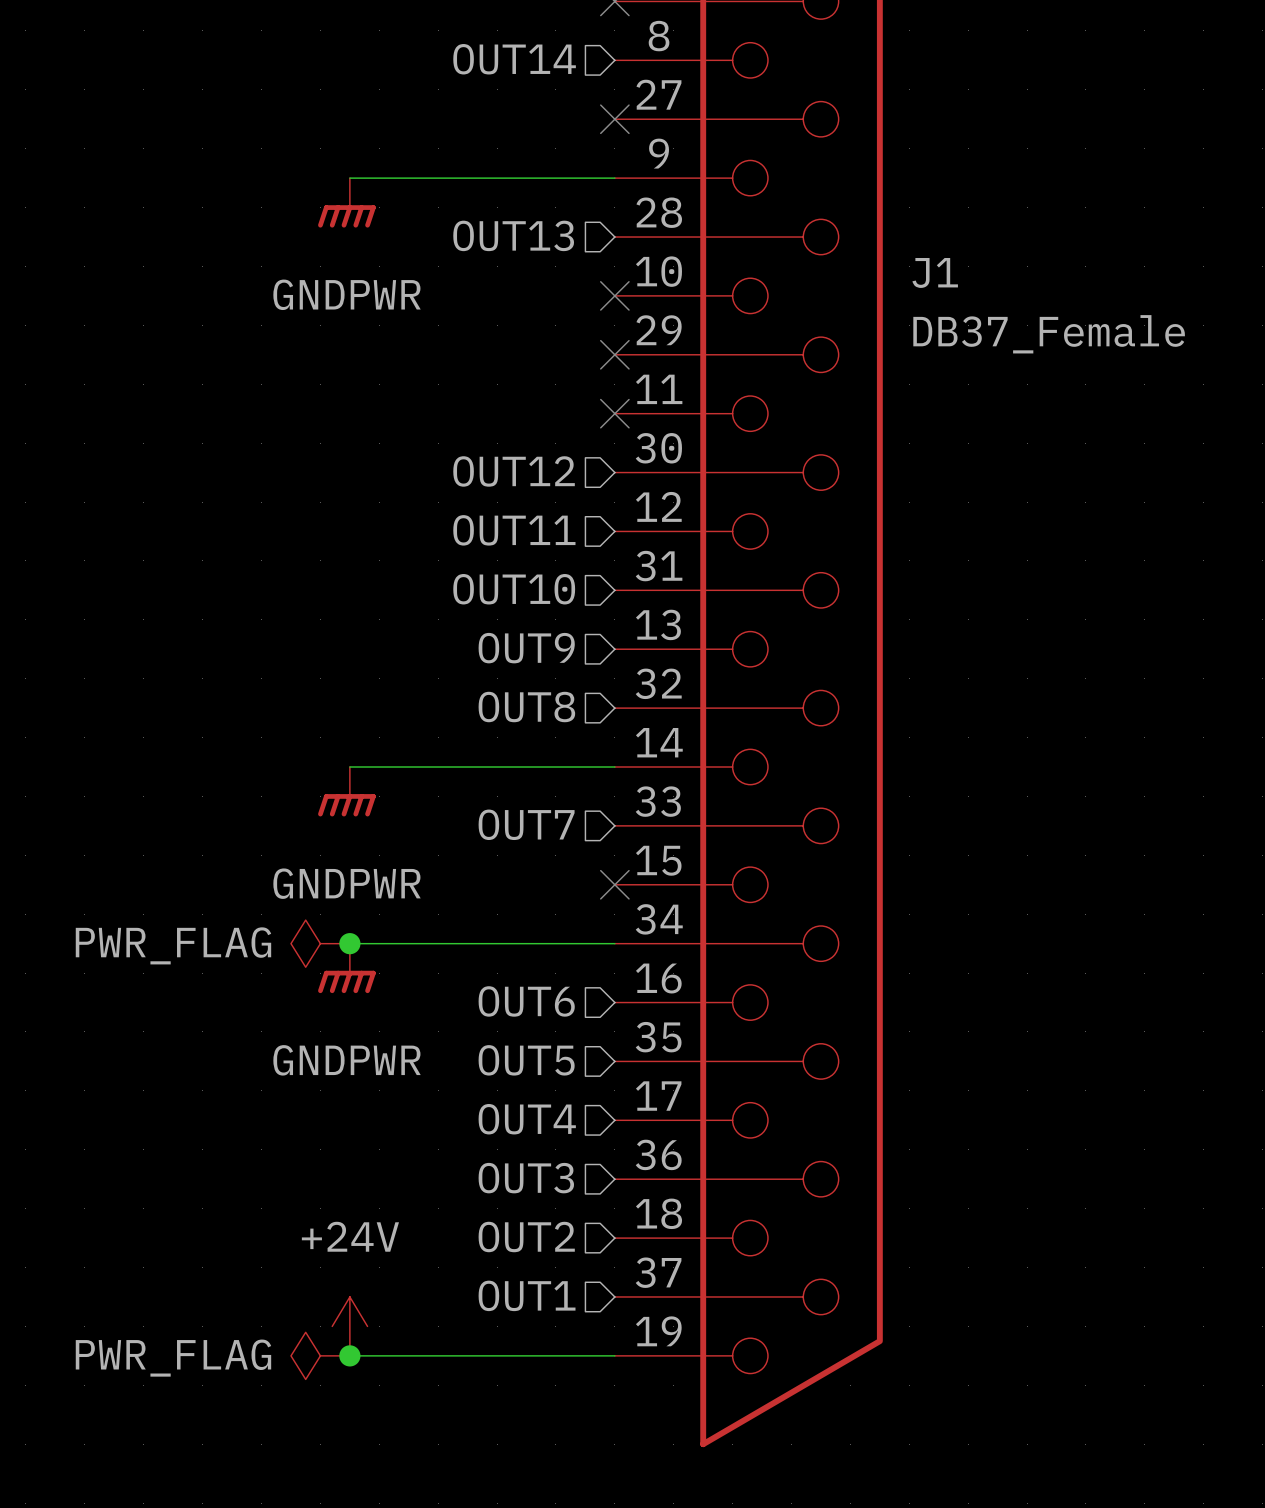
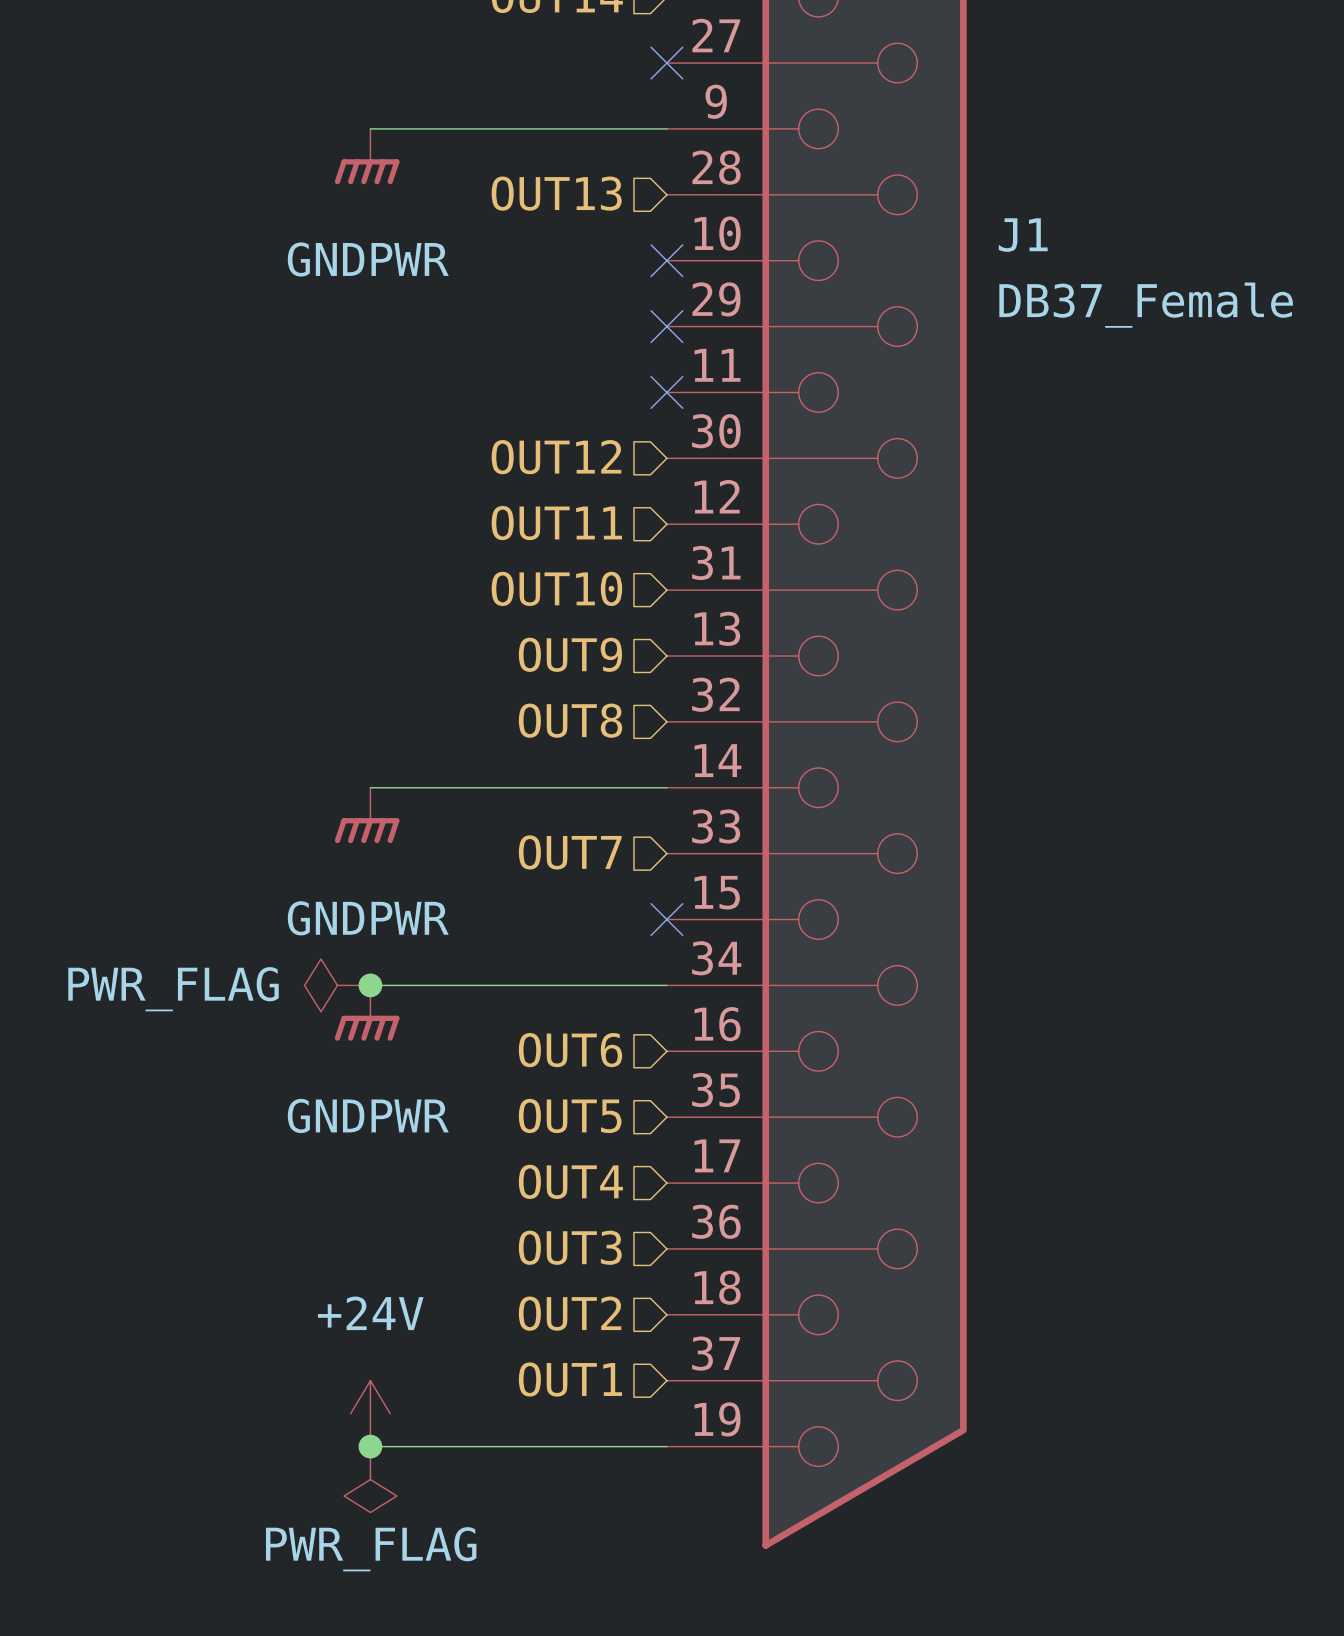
power symbol rotation: 0° (320, 1355) -> 90° counterclockwise (370, 1479)
power symbol position: PWR_FLAG (320, 1355) -> PWR_FLAG (370, 1479)
power symbol text position: PWR_FLAG (173, 1358) -> PWR_FLAG (371, 1549)

